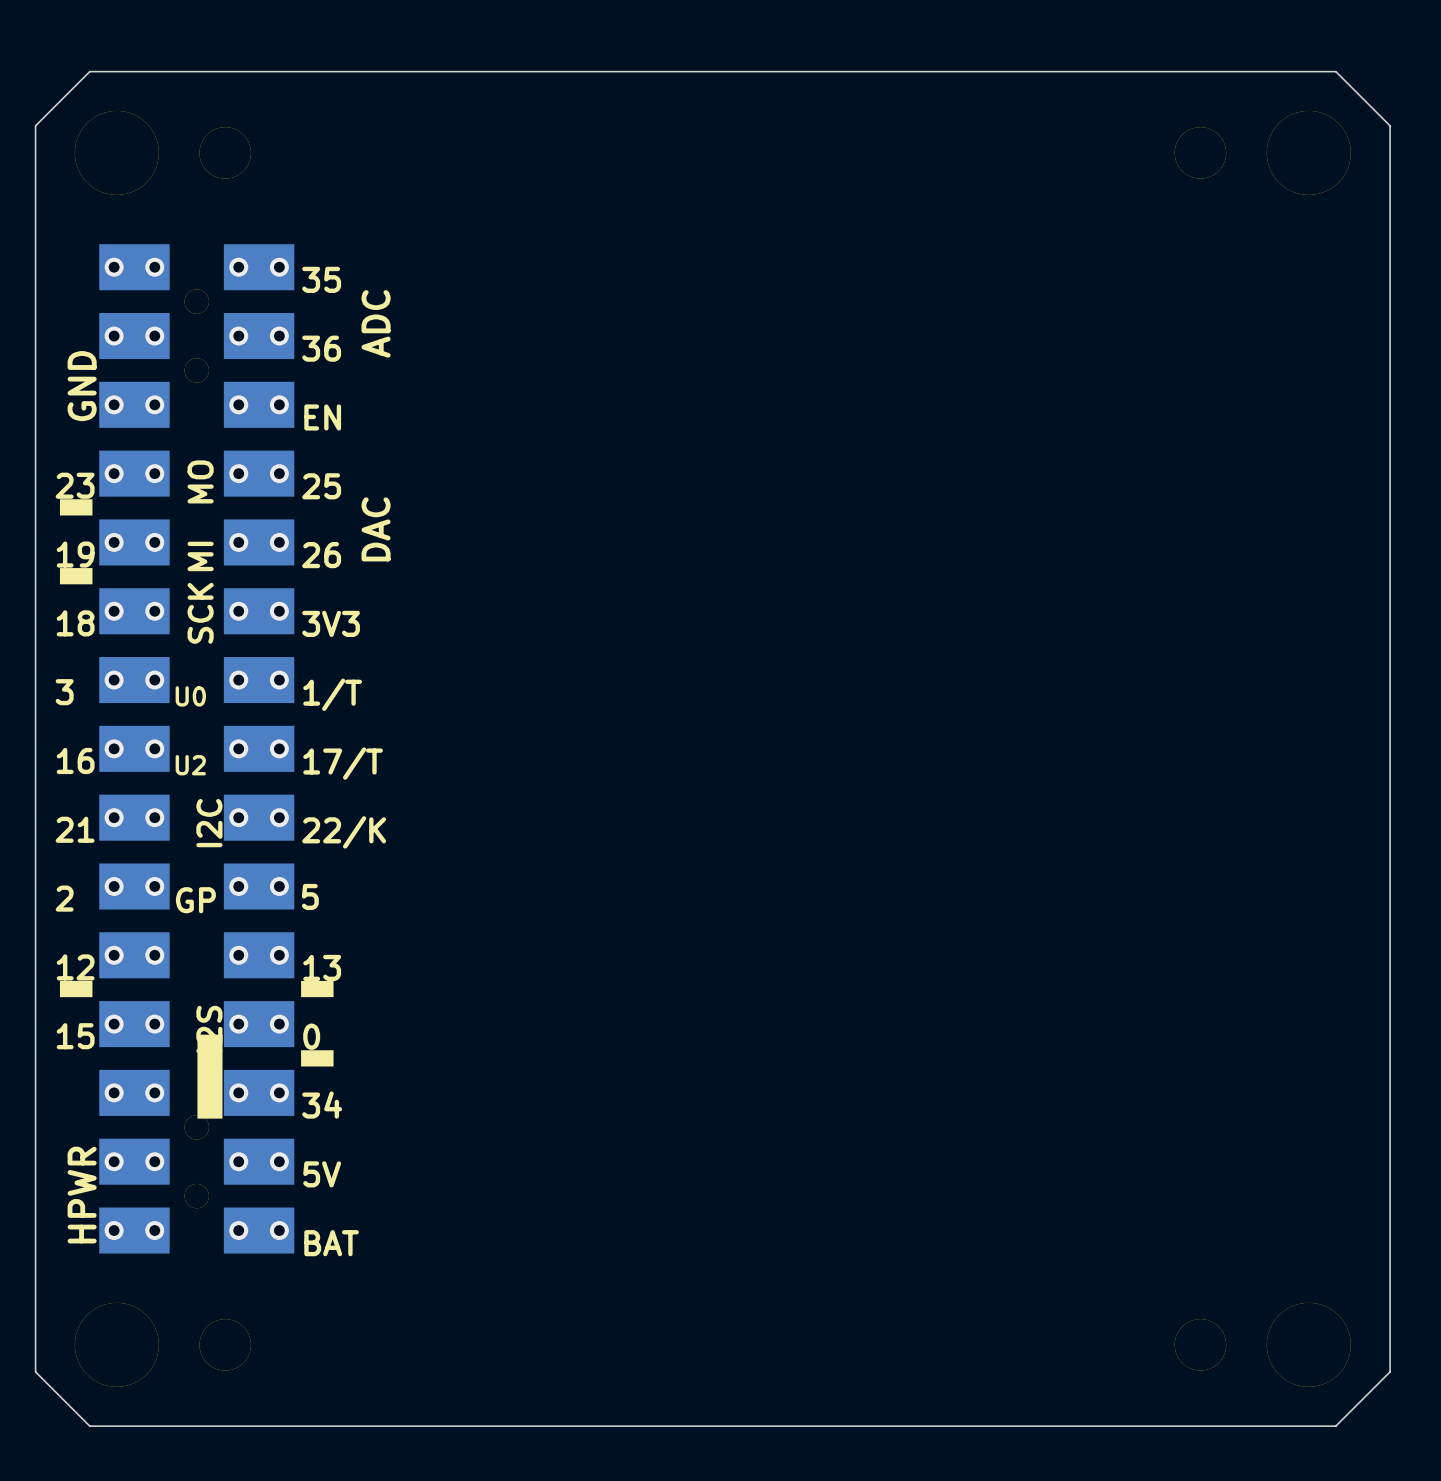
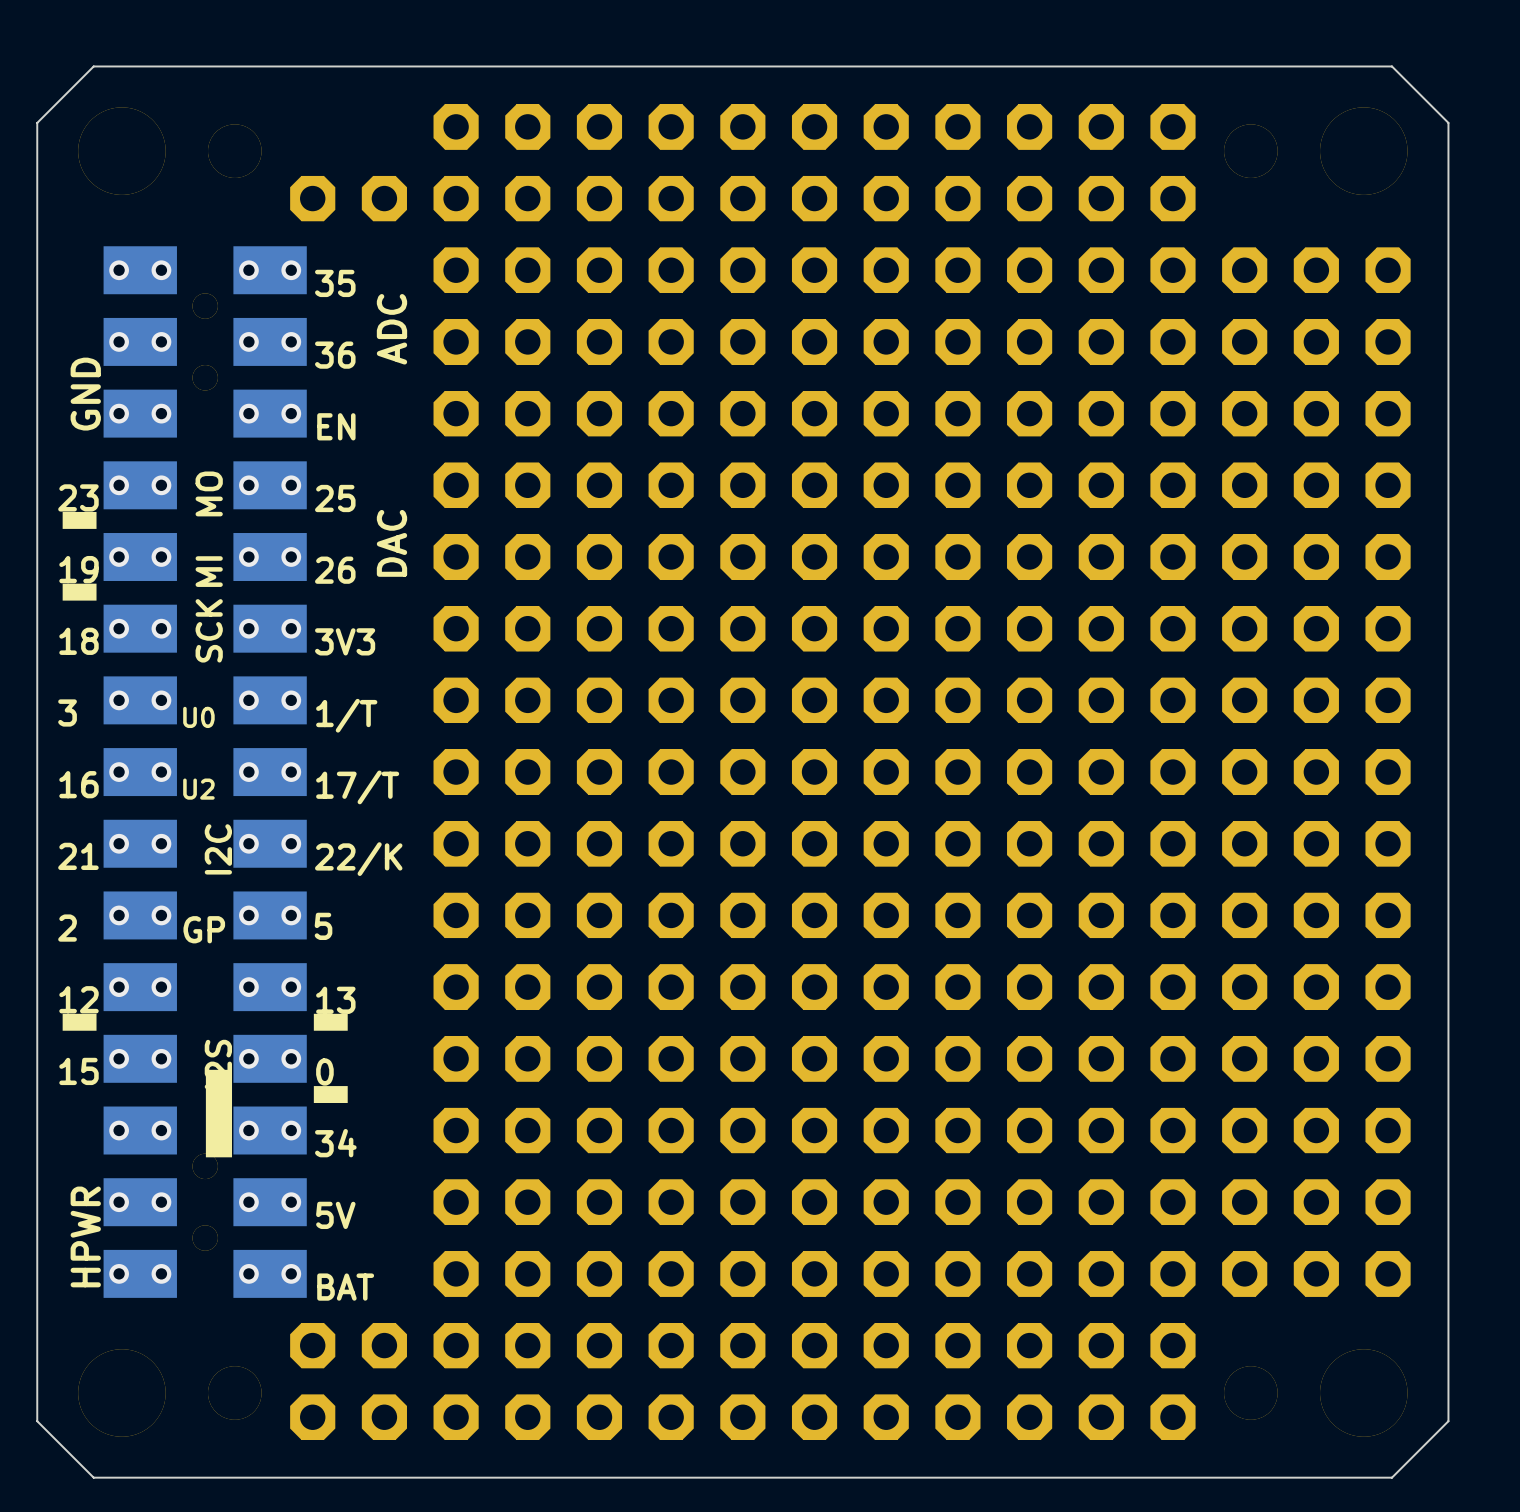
part: none -> (456, 126)
part: none -> (527, 126)
part: none -> (599, 126)
part: none -> (671, 126)
part: none -> (742, 126)
part: none -> (814, 126)
part: none -> (886, 126)
part: none -> (957, 126)
part: none -> (1029, 126)
part: none -> (1101, 126)
part: none -> (1172, 126)
part: none -> (312, 198)
part: none -> (384, 198)
part: none -> (456, 198)
part: none -> (527, 198)
part: none -> (599, 198)
part: none -> (671, 198)
part: none -> (742, 198)
part: none -> (814, 198)
part: none -> (886, 198)
part: none -> (957, 198)
part: none -> (1029, 198)
part: none -> (1101, 198)
part: none -> (1172, 198)
part: none -> (456, 270)
part: none -> (527, 270)
part: none -> (599, 270)
part: none -> (671, 270)
part: none -> (742, 270)
part: none -> (814, 270)
part: none -> (886, 270)
part: none -> (957, 270)
part: none -> (1029, 270)
part: none -> (1101, 270)
part: none -> (1172, 270)
part: none -> (1244, 270)
part: none -> (1316, 270)
part: none -> (1388, 270)
part: none -> (456, 341)
part: none -> (527, 341)
part: none -> (599, 341)
part: none -> (671, 341)
part: none -> (742, 341)
part: none -> (814, 341)
part: none -> (886, 341)
part: none -> (957, 341)
part: none -> (1029, 341)
part: none -> (1101, 341)
part: none -> (1172, 341)
part: none -> (1244, 341)
part: none -> (1316, 341)
part: none -> (1388, 341)
part: none -> (456, 413)
part: none -> (527, 413)
part: none -> (599, 413)
part: none -> (671, 413)
part: none -> (742, 413)
part: none -> (814, 413)
part: none -> (886, 413)
part: none -> (957, 413)
part: none -> (1029, 413)
part: none -> (1101, 413)
part: none -> (1172, 413)
part: none -> (1244, 413)
part: none -> (1316, 413)
part: none -> (1388, 413)
part: none -> (456, 485)
part: none -> (527, 485)
part: none -> (599, 485)
part: none -> (671, 485)
part: none -> (742, 485)
part: none -> (814, 485)
part: none -> (886, 485)
part: none -> (957, 485)
part: none -> (1029, 485)
part: none -> (1101, 485)
part: none -> (1172, 485)
part: none -> (1244, 485)
part: none -> (1316, 485)
part: none -> (1388, 485)
part: none -> (456, 557)
part: none -> (527, 557)
part: none -> (599, 557)
part: none -> (671, 557)
part: none -> (742, 557)
part: none -> (814, 557)
part: none -> (886, 557)
part: none -> (957, 557)
part: none -> (1029, 557)
part: none -> (1101, 557)
part: none -> (1172, 557)
part: none -> (1244, 557)
part: none -> (1316, 557)
part: none -> (1388, 557)
part: none -> (456, 628)
part: none -> (527, 628)
part: none -> (599, 628)
part: none -> (671, 628)
part: none -> (742, 628)
part: none -> (814, 628)
part: none -> (886, 628)
part: none -> (957, 628)
part: none -> (1029, 628)
part: none -> (1101, 628)
part: none -> (1172, 628)
part: none -> (1244, 628)
part: none -> (1316, 628)
part: none -> (1388, 628)
part: none -> (456, 700)
part: none -> (527, 700)
part: none -> (599, 700)
part: none -> (671, 700)
part: none -> (742, 700)
part: none -> (814, 700)
part: none -> (886, 700)
part: none -> (957, 700)
part: none -> (1029, 700)
part: none -> (1101, 700)
part: none -> (1172, 700)
part: none -> (1244, 700)
part: none -> (1316, 700)
part: none -> (1388, 700)
part: none -> (456, 772)
part: none -> (527, 772)
part: none -> (599, 772)
part: none -> (671, 772)
part: none -> (742, 772)
part: none -> (814, 772)
part: none -> (886, 772)
part: none -> (957, 772)
part: none -> (1029, 772)
part: none -> (1101, 772)
part: none -> (1172, 772)
part: none -> (1244, 772)
part: none -> (1316, 772)
part: none -> (1388, 772)
part: none -> (456, 843)
part: none -> (527, 843)
part: none -> (599, 843)
part: none -> (671, 843)
part: none -> (742, 843)
part: none -> (814, 843)
part: none -> (886, 843)
part: none -> (957, 843)
part: none -> (1029, 843)
part: none -> (1101, 843)
part: none -> (1172, 843)
part: none -> (1244, 843)
part: none -> (1316, 843)
part: none -> (1388, 843)
part: none -> (456, 915)
part: none -> (527, 915)
part: none -> (599, 915)
part: none -> (671, 915)
part: none -> (742, 915)
part: none -> (814, 915)
part: none -> (886, 915)
part: none -> (957, 915)
part: none -> (1029, 915)
part: none -> (1101, 915)
part: none -> (1172, 915)
part: none -> (1244, 915)
part: none -> (1316, 915)
part: none -> (1388, 915)
part: none -> (456, 987)
part: none -> (527, 987)
part: none -> (599, 987)
part: none -> (671, 987)
part: none -> (742, 987)
part: none -> (814, 987)
part: none -> (886, 987)
part: none -> (957, 987)
part: none -> (1029, 987)
part: none -> (1101, 987)
part: none -> (1172, 987)
part: none -> (1244, 987)
part: none -> (1316, 987)
part: none -> (1388, 987)
part: none -> (456, 1058)
part: none -> (527, 1058)
part: none -> (599, 1058)
part: none -> (671, 1058)
part: none -> (742, 1058)
part: none -> (814, 1058)
part: none -> (886, 1058)
part: none -> (957, 1058)
part: none -> (1029, 1058)
part: none -> (1101, 1058)
part: none -> (1172, 1058)
part: none -> (1244, 1058)
part: none -> (1316, 1058)
part: none -> (1388, 1058)
part: none -> (456, 1130)
part: none -> (527, 1130)
part: none -> (599, 1130)
part: none -> (671, 1130)
part: none -> (742, 1130)
part: none -> (814, 1130)
part: none -> (886, 1130)
part: none -> (957, 1130)
part: none -> (1029, 1130)
part: none -> (1101, 1130)
part: none -> (1172, 1130)
part: none -> (1244, 1130)
part: none -> (1316, 1130)
part: none -> (1388, 1130)
part: none -> (456, 1202)
part: none -> (527, 1202)
part: none -> (599, 1202)
part: none -> (671, 1202)
part: none -> (742, 1202)
part: none -> (814, 1202)
part: none -> (886, 1202)
part: none -> (957, 1202)
part: none -> (1029, 1202)
part: none -> (1101, 1202)
part: none -> (1172, 1202)
part: none -> (1244, 1202)
part: none -> (1316, 1202)
part: none -> (1388, 1202)
part: none -> (456, 1273)
part: none -> (527, 1273)
part: none -> (599, 1273)
part: none -> (671, 1273)
part: none -> (742, 1273)
part: none -> (814, 1273)
part: none -> (886, 1273)
part: none -> (957, 1273)
part: none -> (1029, 1273)
part: none -> (1101, 1273)
part: none -> (1172, 1273)
part: none -> (1244, 1273)
part: none -> (1316, 1273)
part: none -> (1388, 1273)
part: none -> (312, 1345)
part: none -> (384, 1345)
part: none -> (456, 1345)
part: none -> (527, 1345)
part: none -> (599, 1345)
part: none -> (671, 1345)
part: none -> (742, 1345)
part: none -> (814, 1345)
part: none -> (886, 1345)
part: none -> (957, 1345)
part: none -> (1029, 1345)
part: none -> (1101, 1345)
part: none -> (1172, 1345)
part: none -> (312, 1417)
part: none -> (384, 1417)
part: none -> (456, 1417)
part: none -> (527, 1417)
part: none -> (599, 1417)
part: none -> (671, 1417)
part: none -> (742, 1417)
part: none -> (814, 1417)
part: none -> (886, 1417)
part: none -> (957, 1417)
part: none -> (1029, 1417)
part: none -> (1101, 1417)
part: none -> (1172, 1417)

